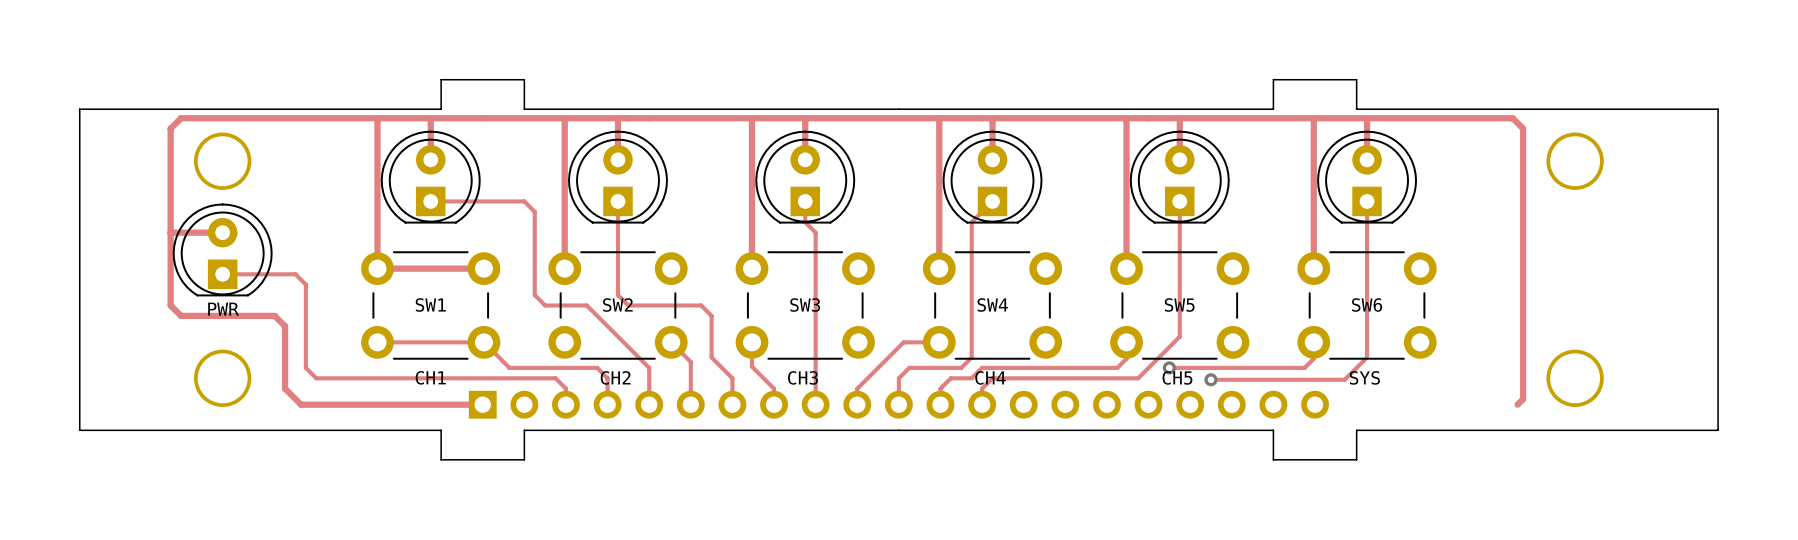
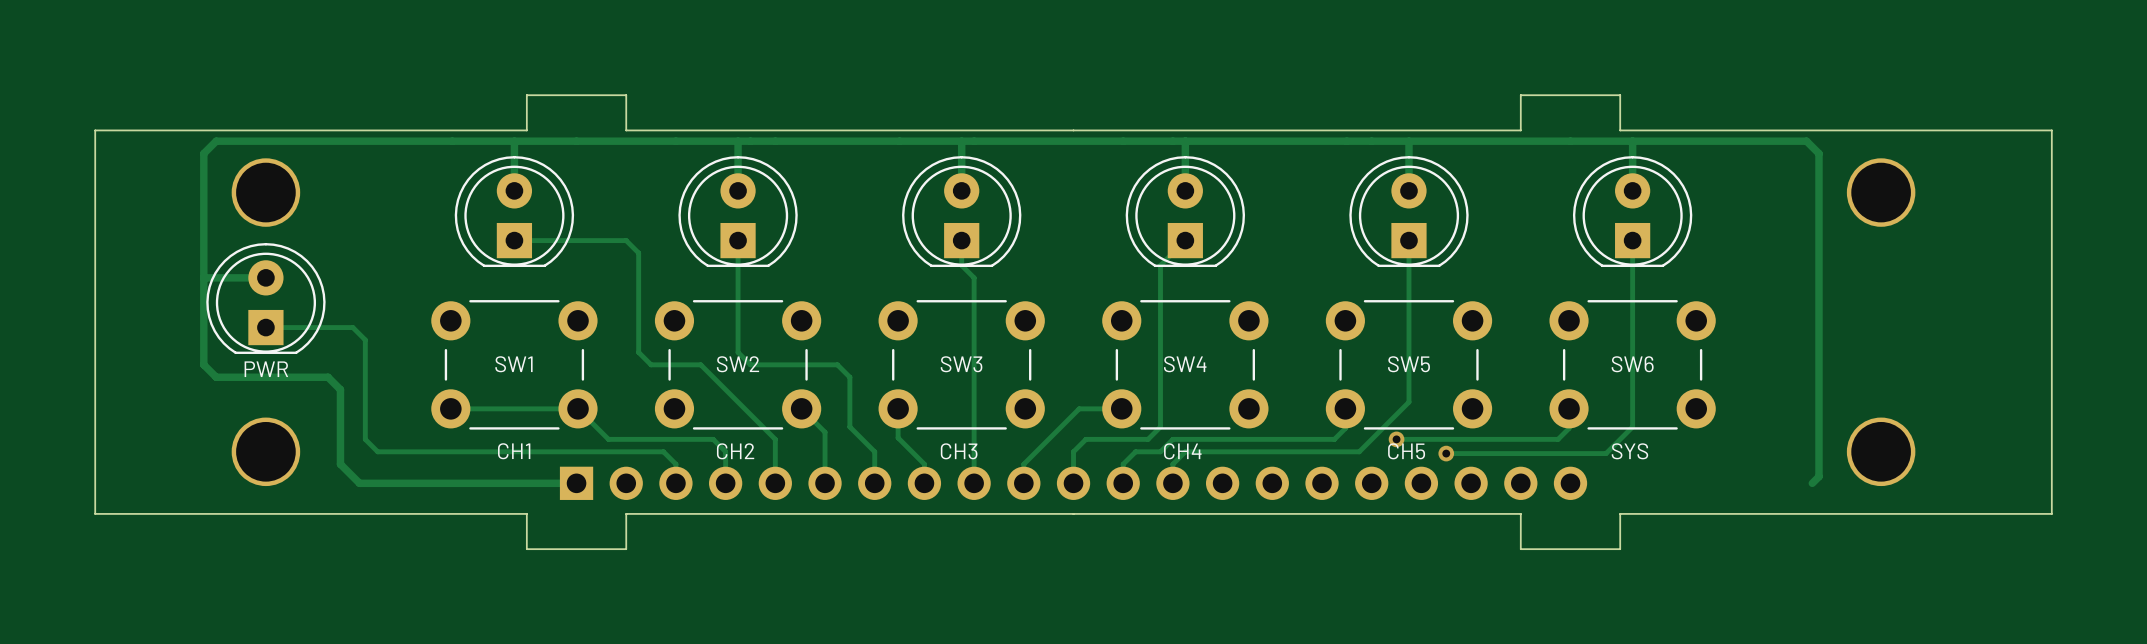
track: (378, 118) (377, 268) (483, 268) -> none
track: (565, 118) (564, 268) -> none
track: (753, 118) (752, 268) -> none
track: (940, 118) (939, 268) -> none
track: (1127, 118) (1126, 268) -> none
track: (1315, 118) (1313, 268) -> none

